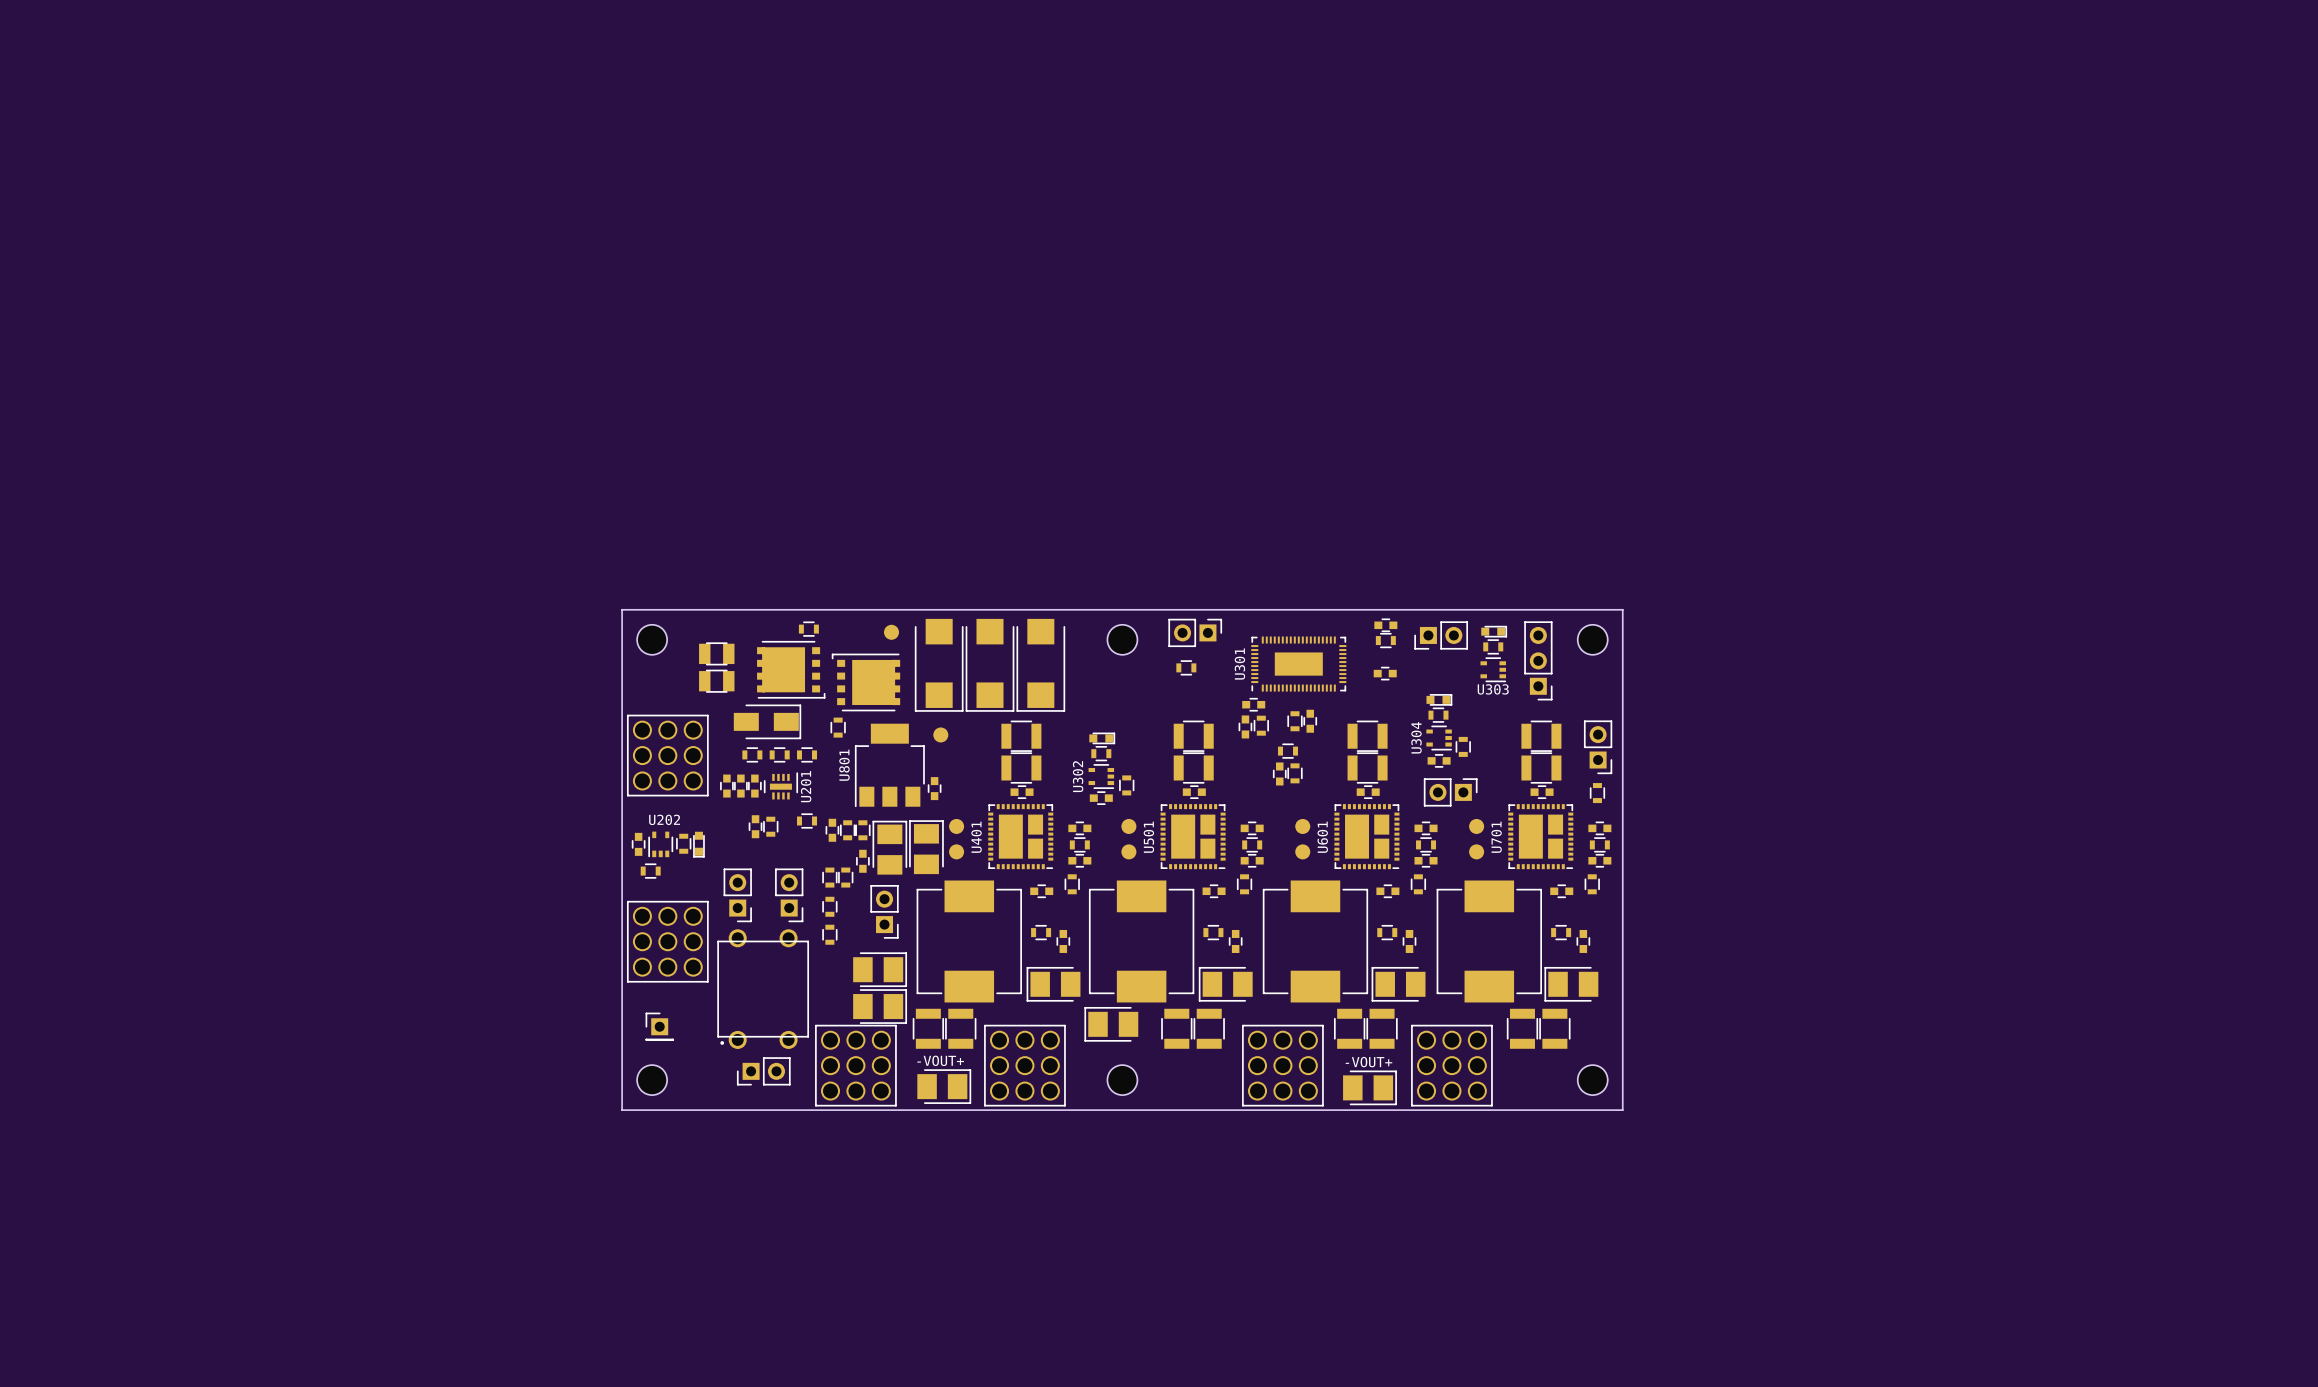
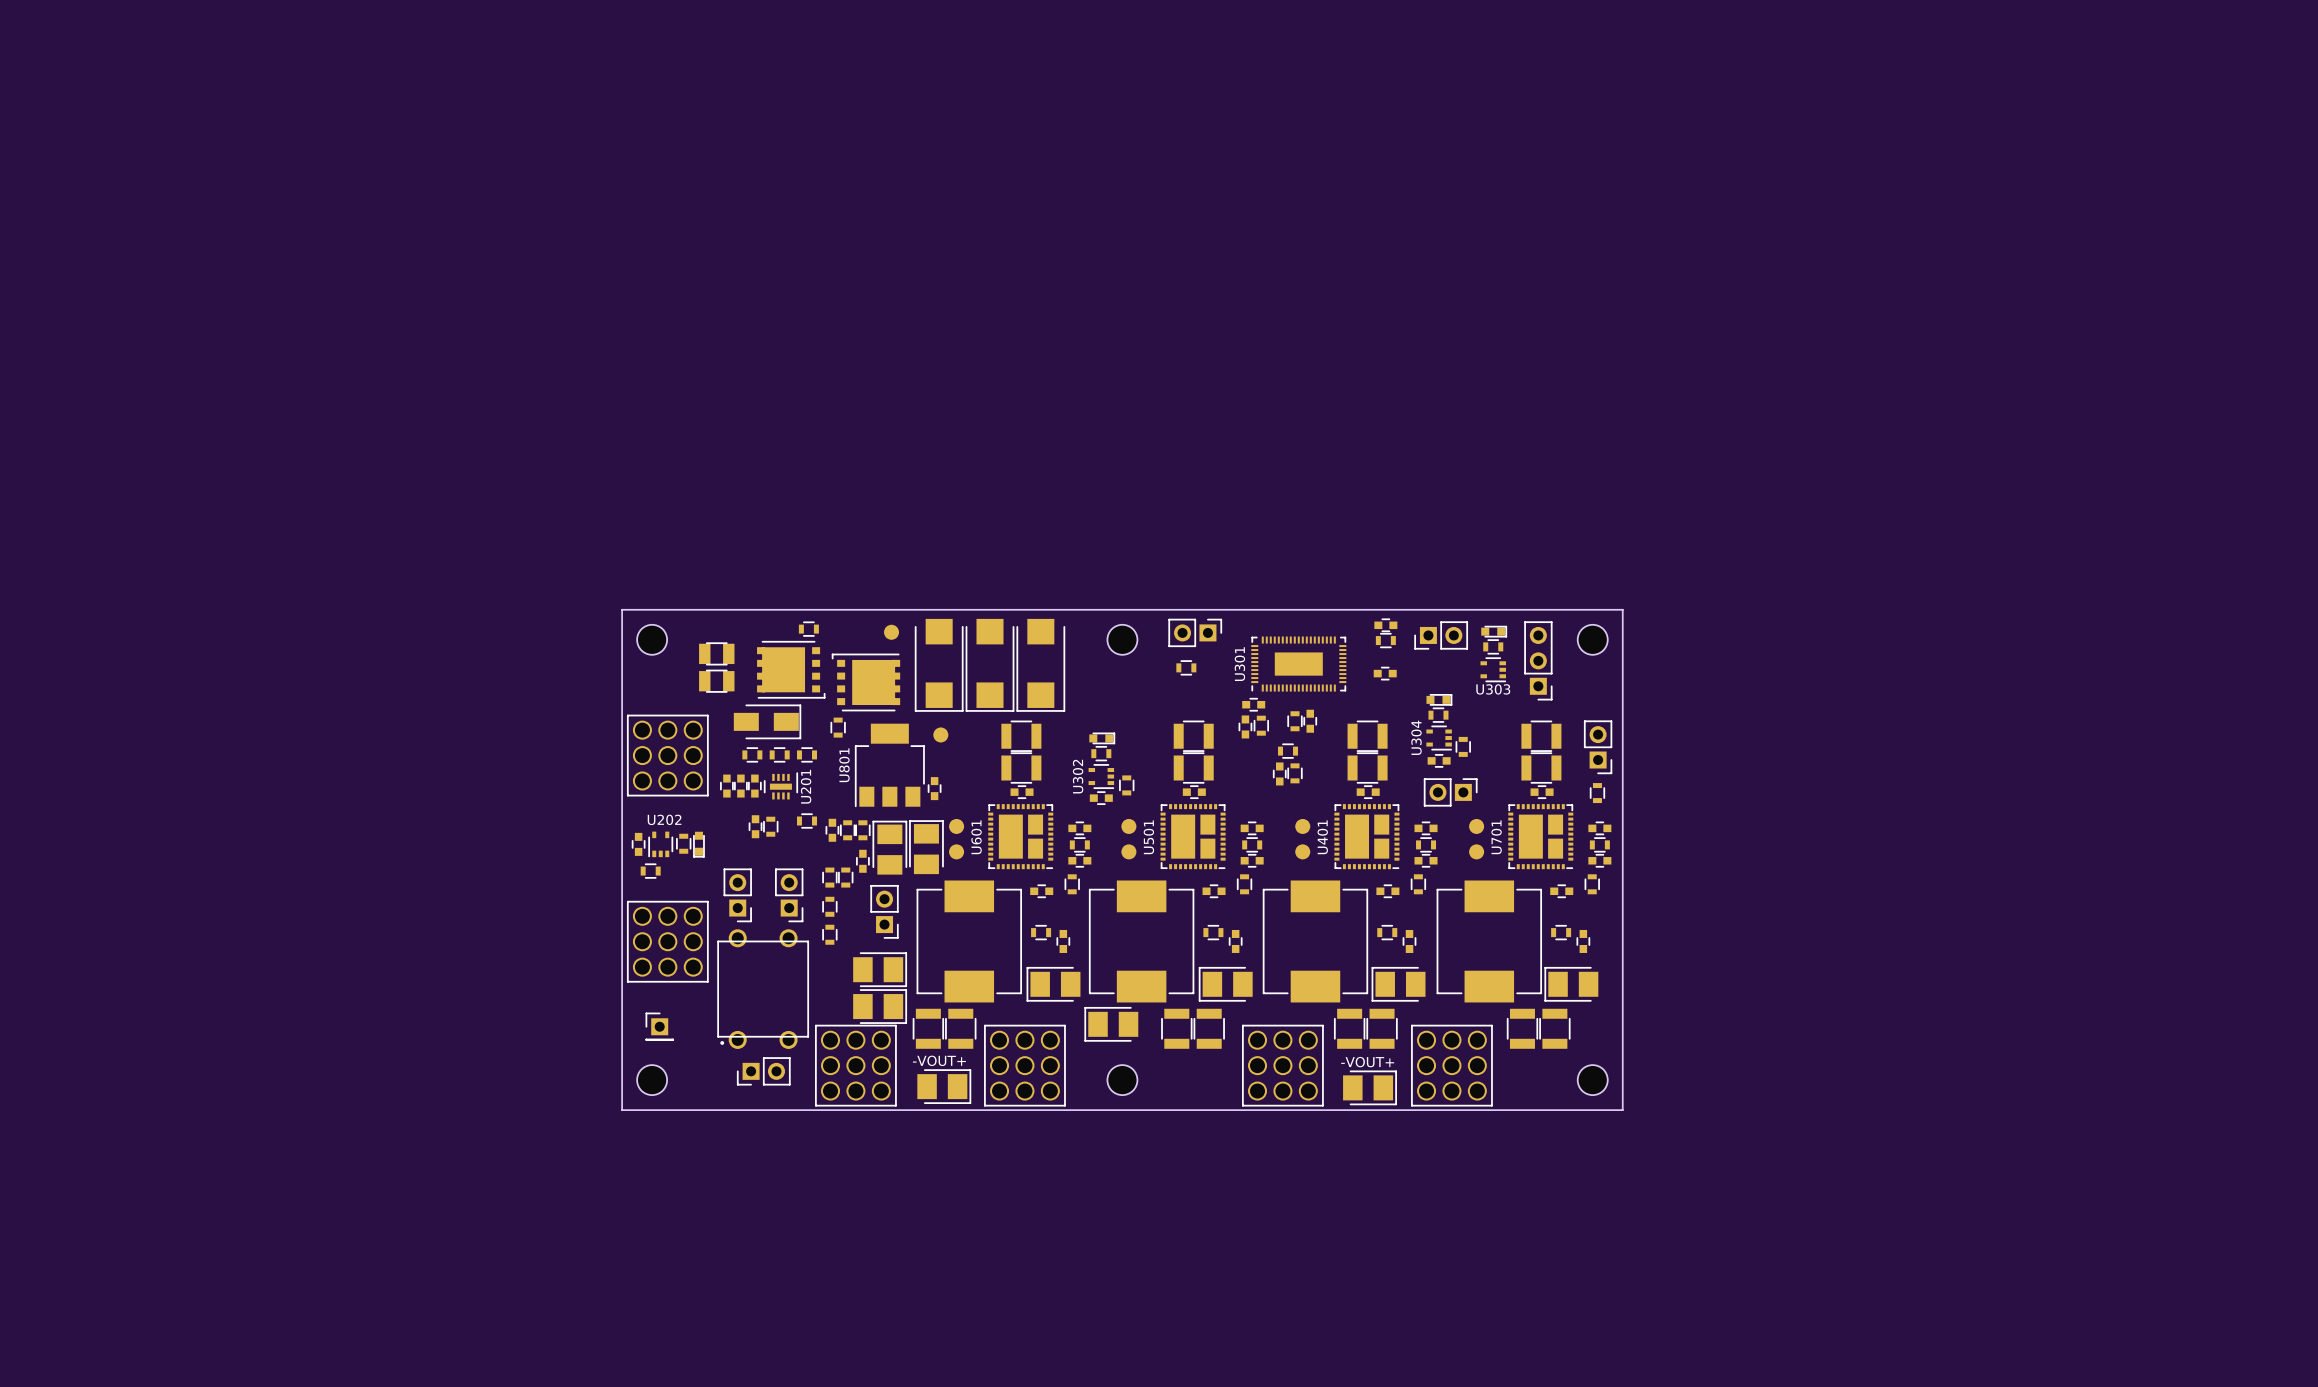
U401 name: U401 (976, 837) -> U601 (976, 837)
U601 name: U601 (1322, 837) -> U401 (1322, 837)

